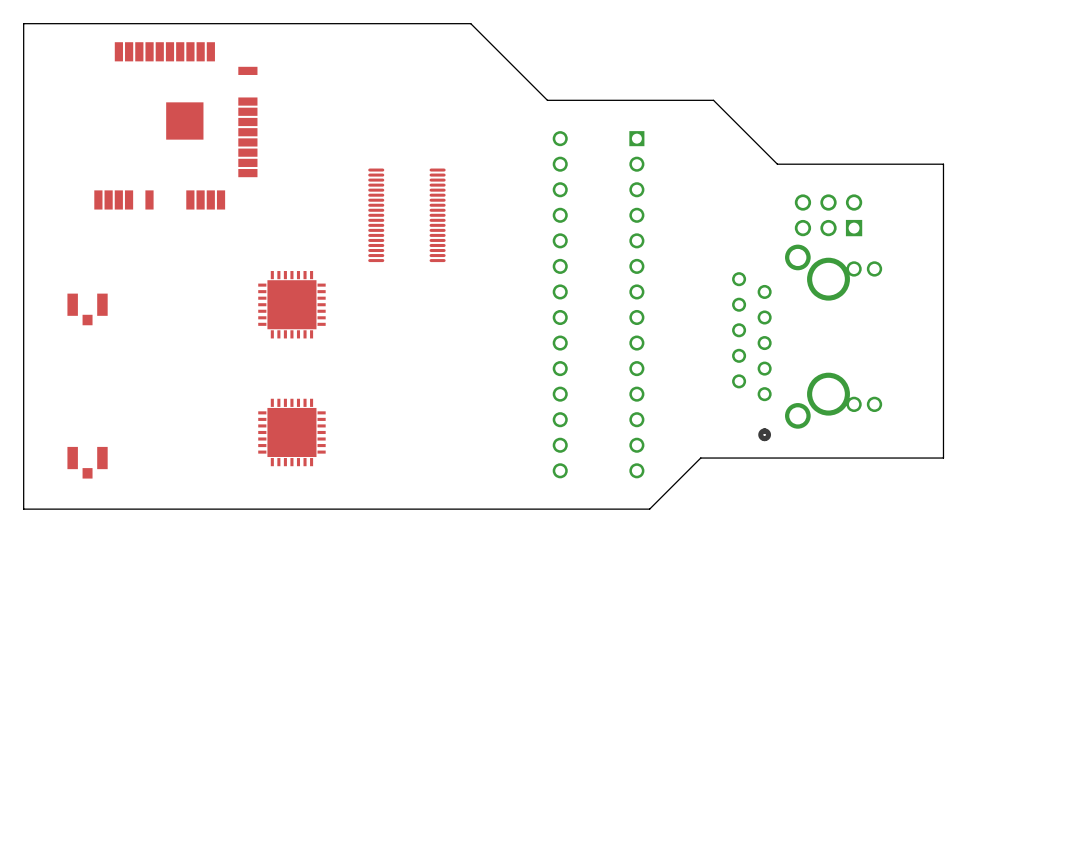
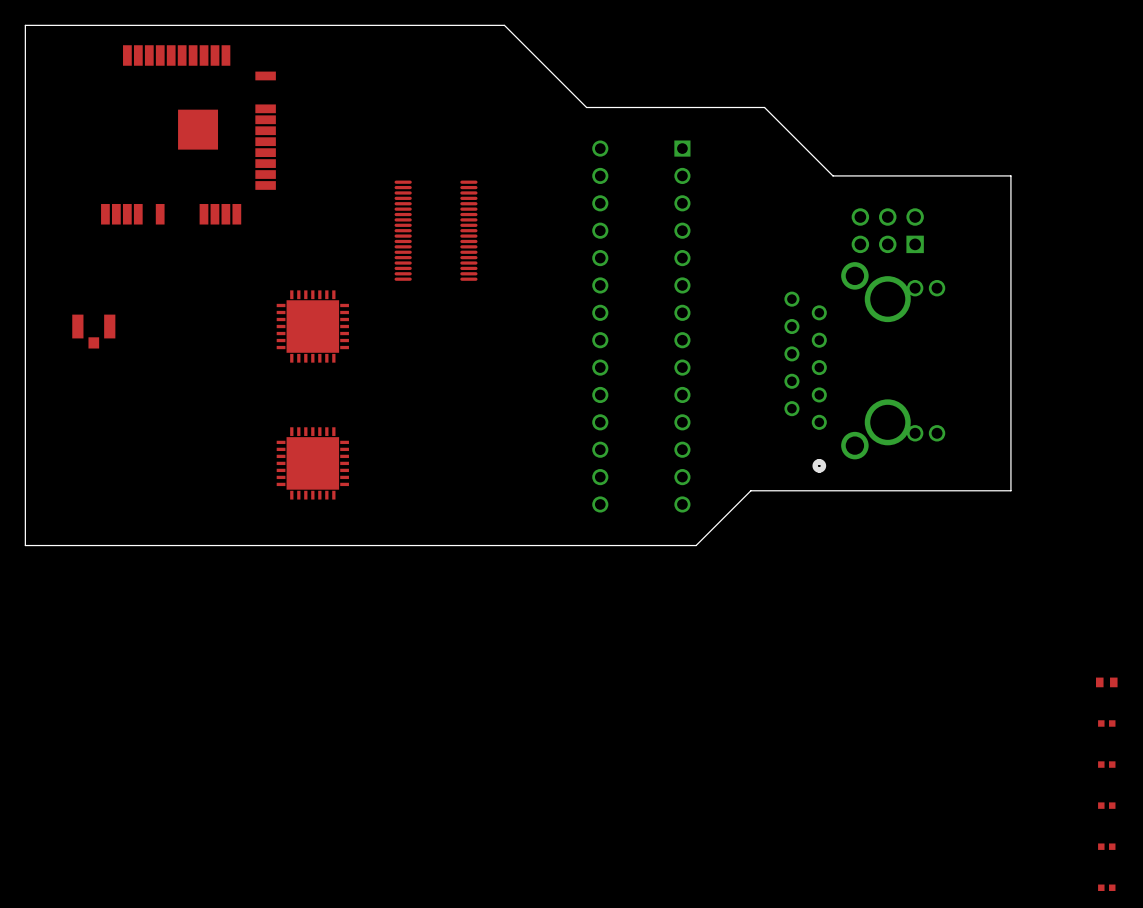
part: (87, 462) -> none
part: none -> (1106, 682)
part: none -> (1106, 723)
part: none -> (1106, 764)
part: none -> (1106, 805)
part: none -> (1106, 846)
part: none -> (1106, 887)

